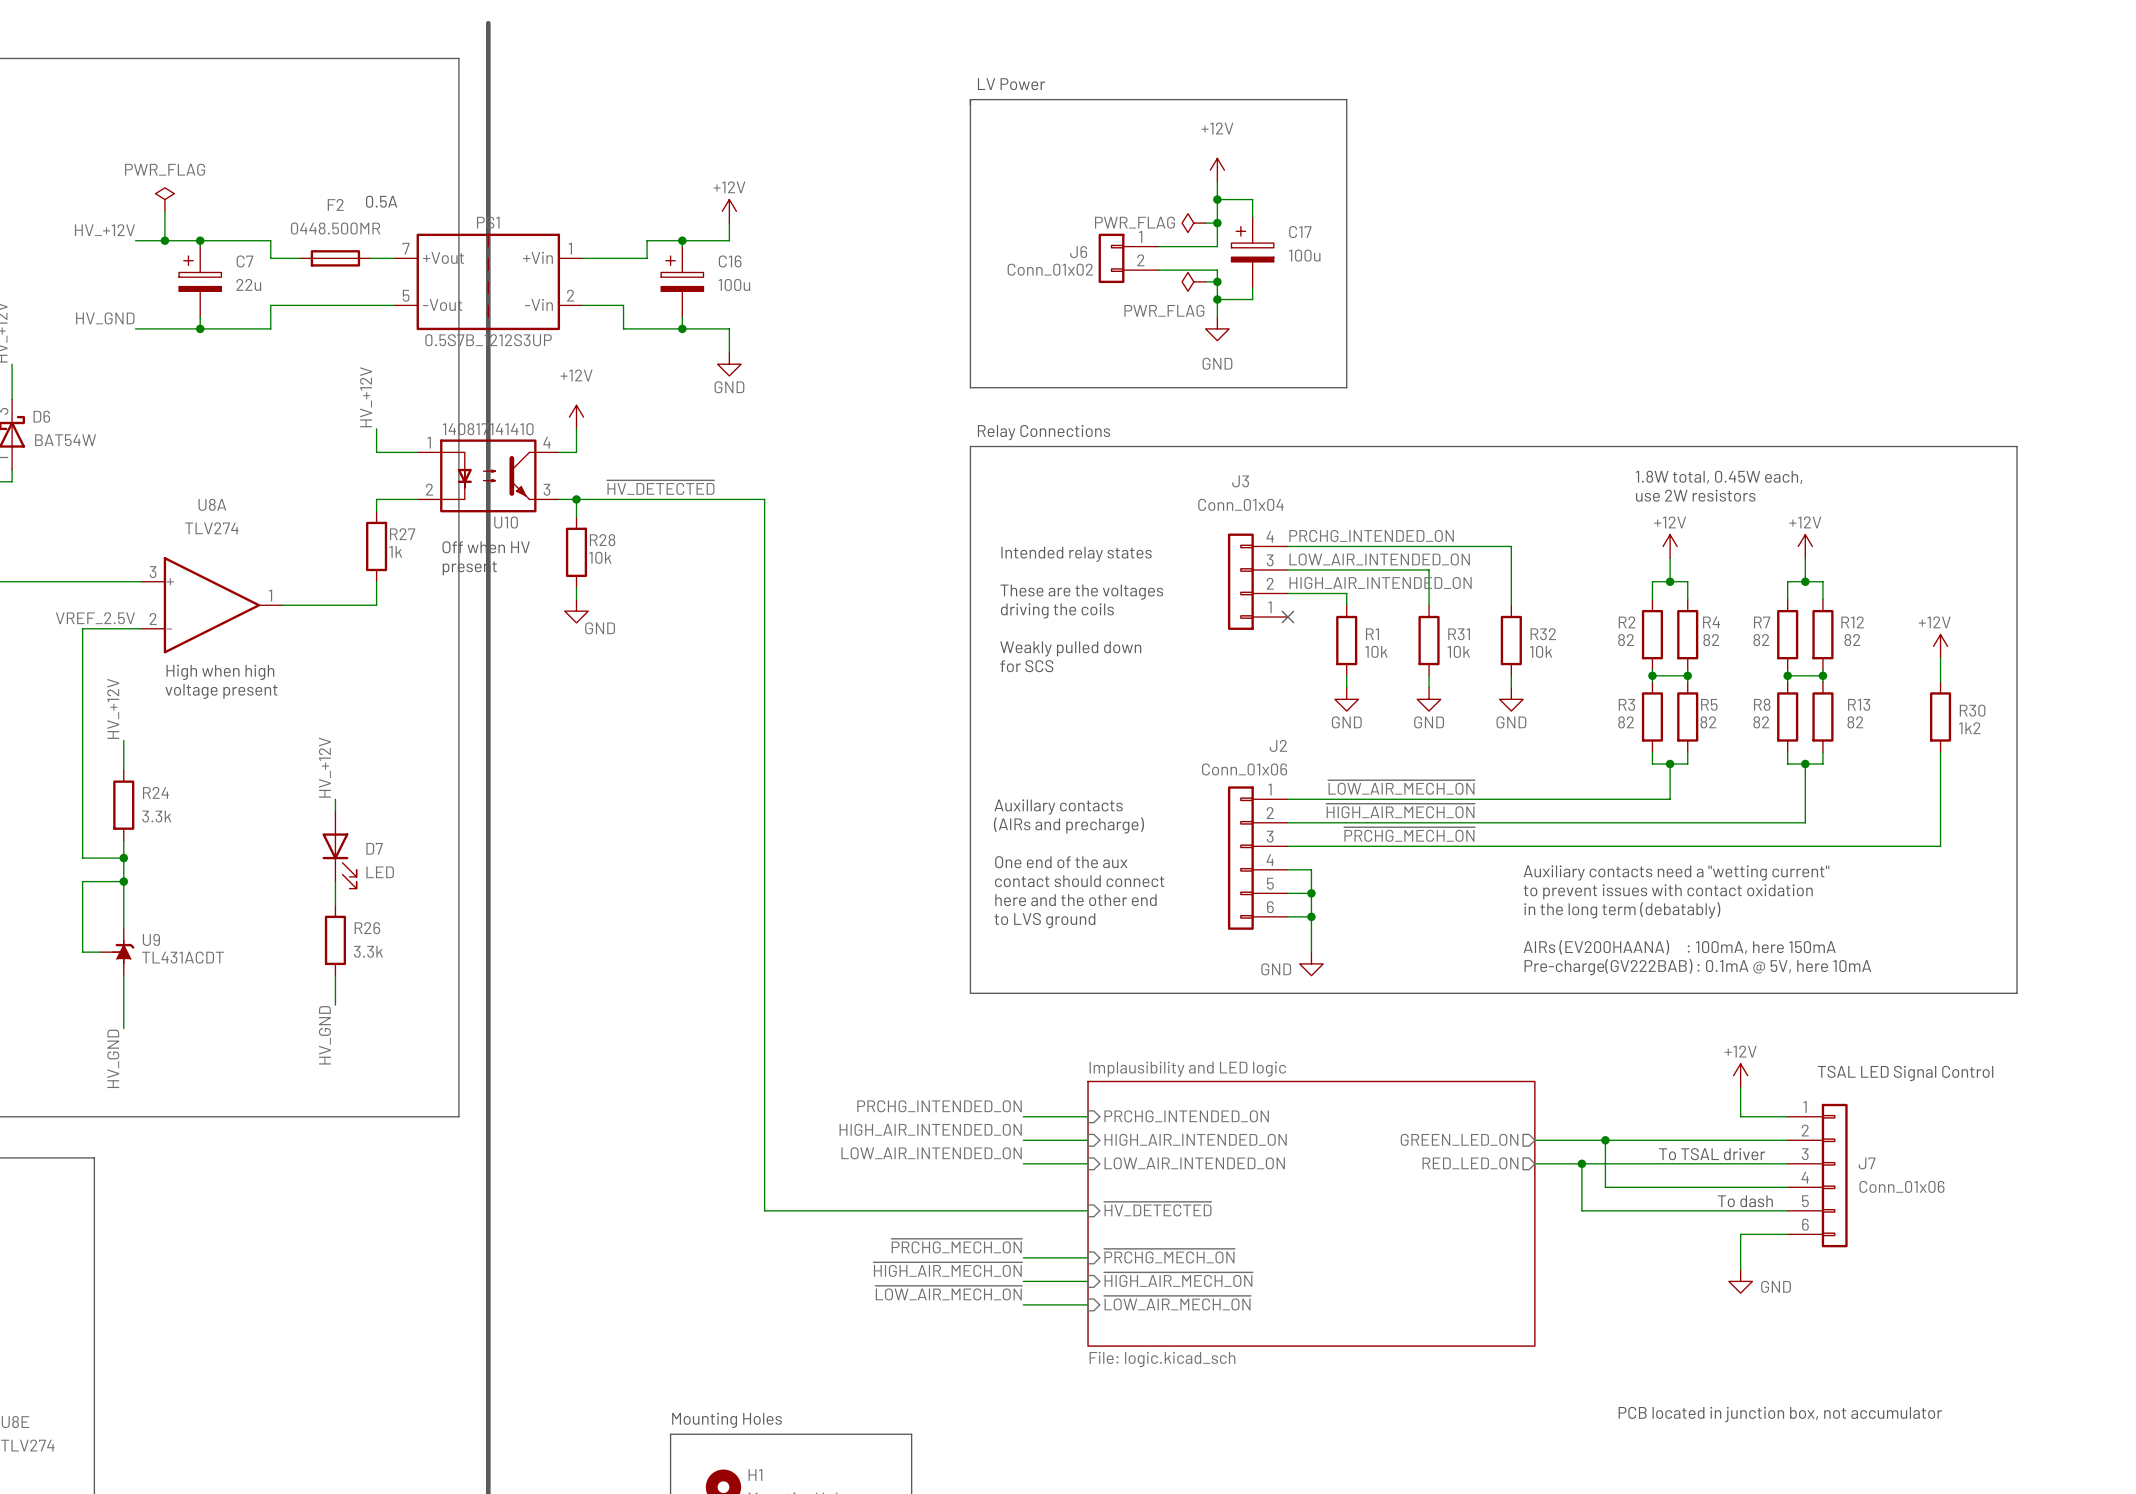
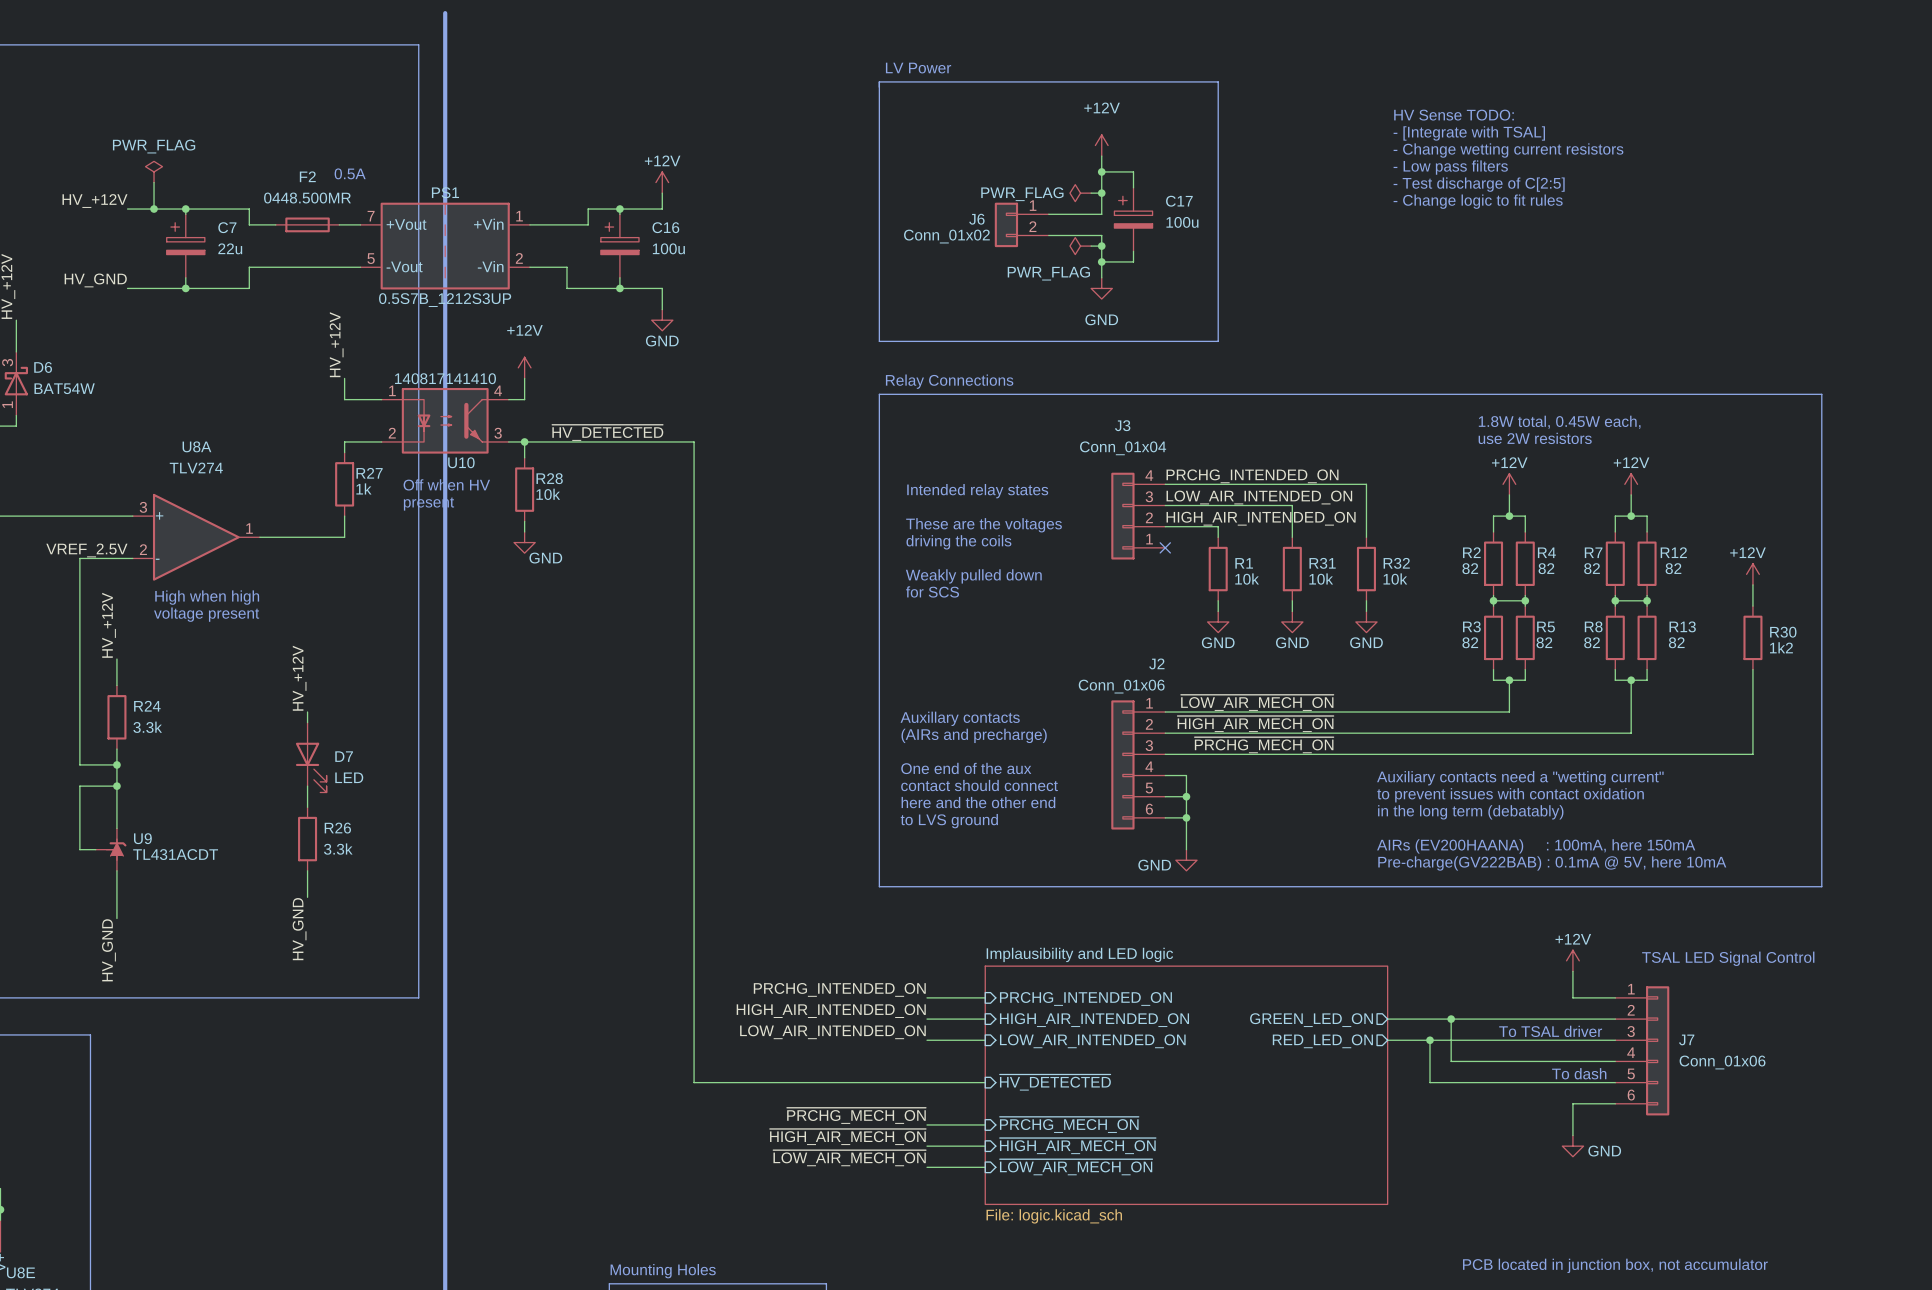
text: none -> HV Sense TODO: (1454, 115)
text: none -> - [Integrate with TSAL] (1469, 133)
text: none -> - Change wetting current resistors (1508, 150)
text: none -> - Low pass filters (1450, 167)
text: none -> - Test discharge of C[2:5] (1479, 184)
text: none -> - Change logic to fit rules (1478, 201)

